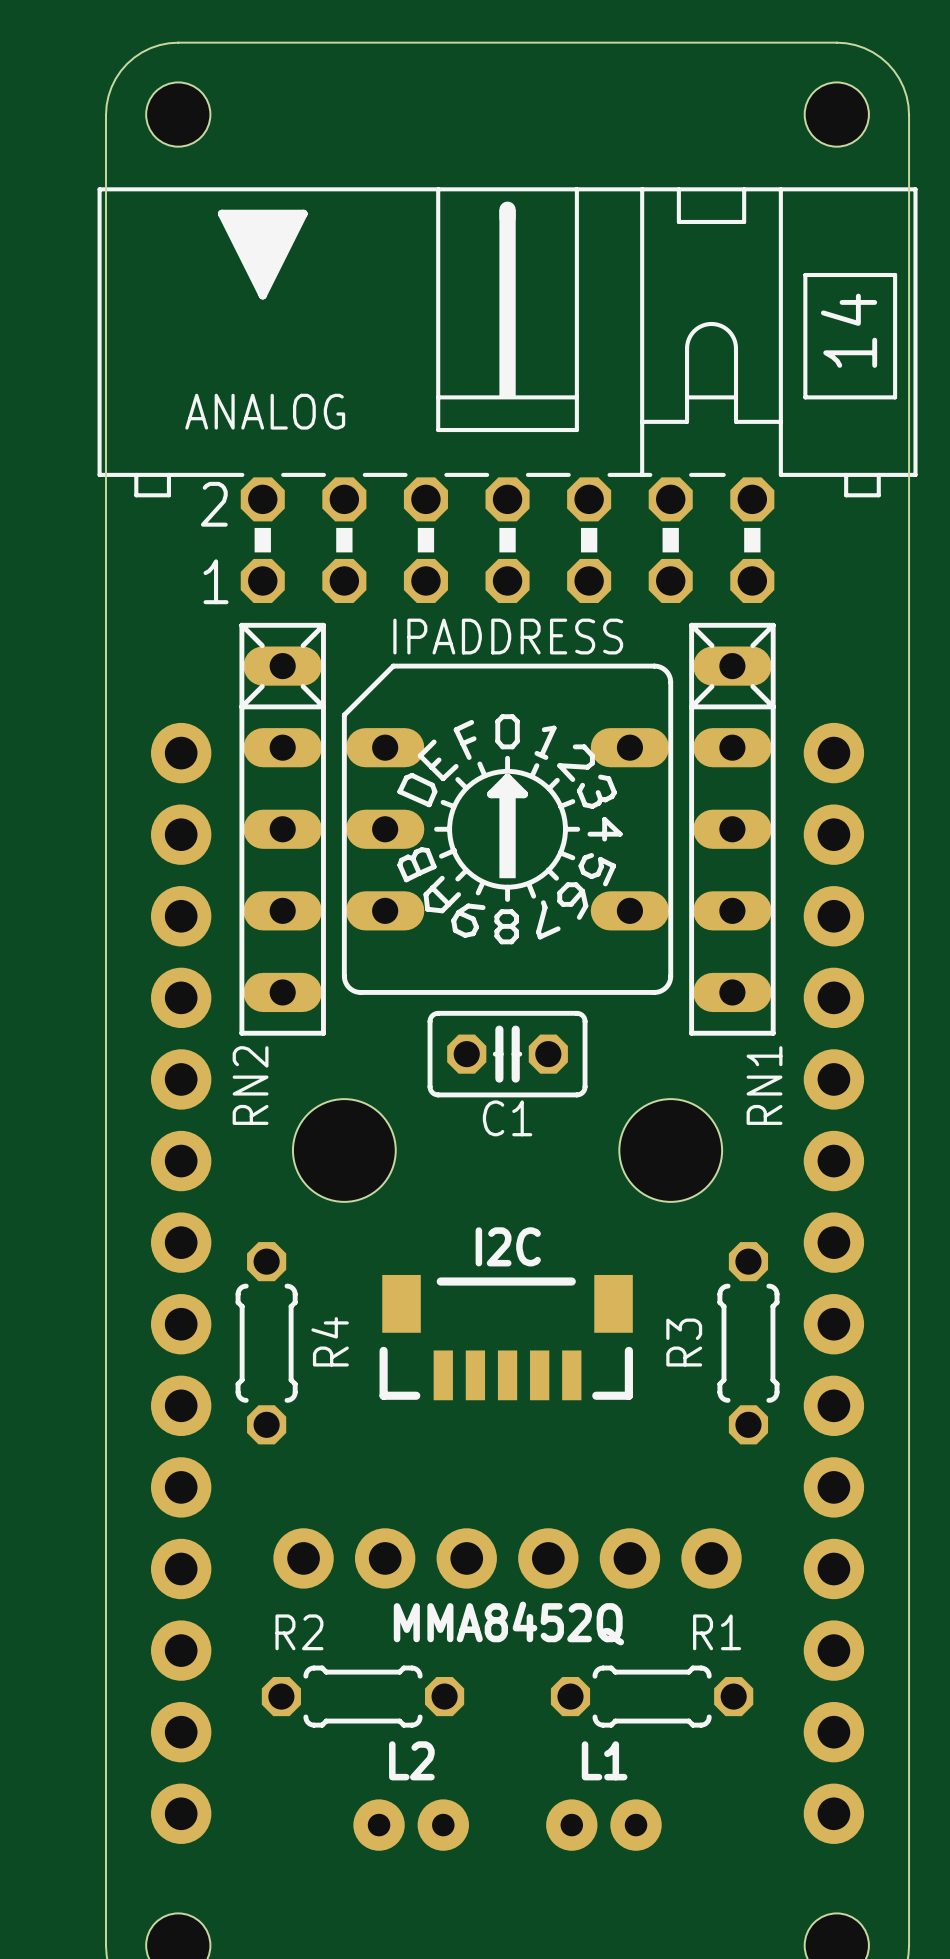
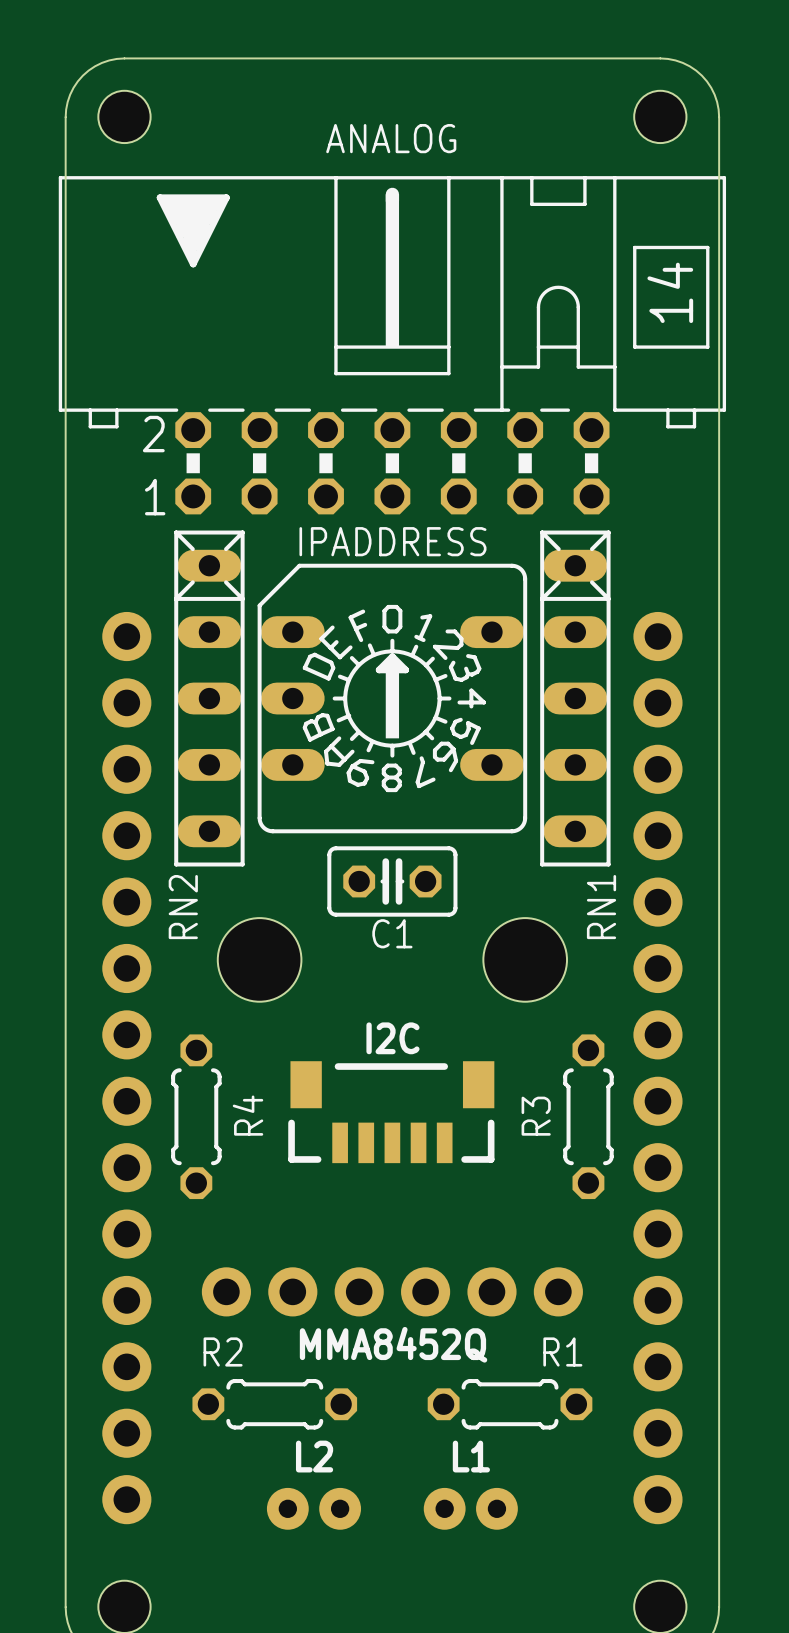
ANALOG name position: ANALOG (265, 411) -> ANALOG (391, 138)

